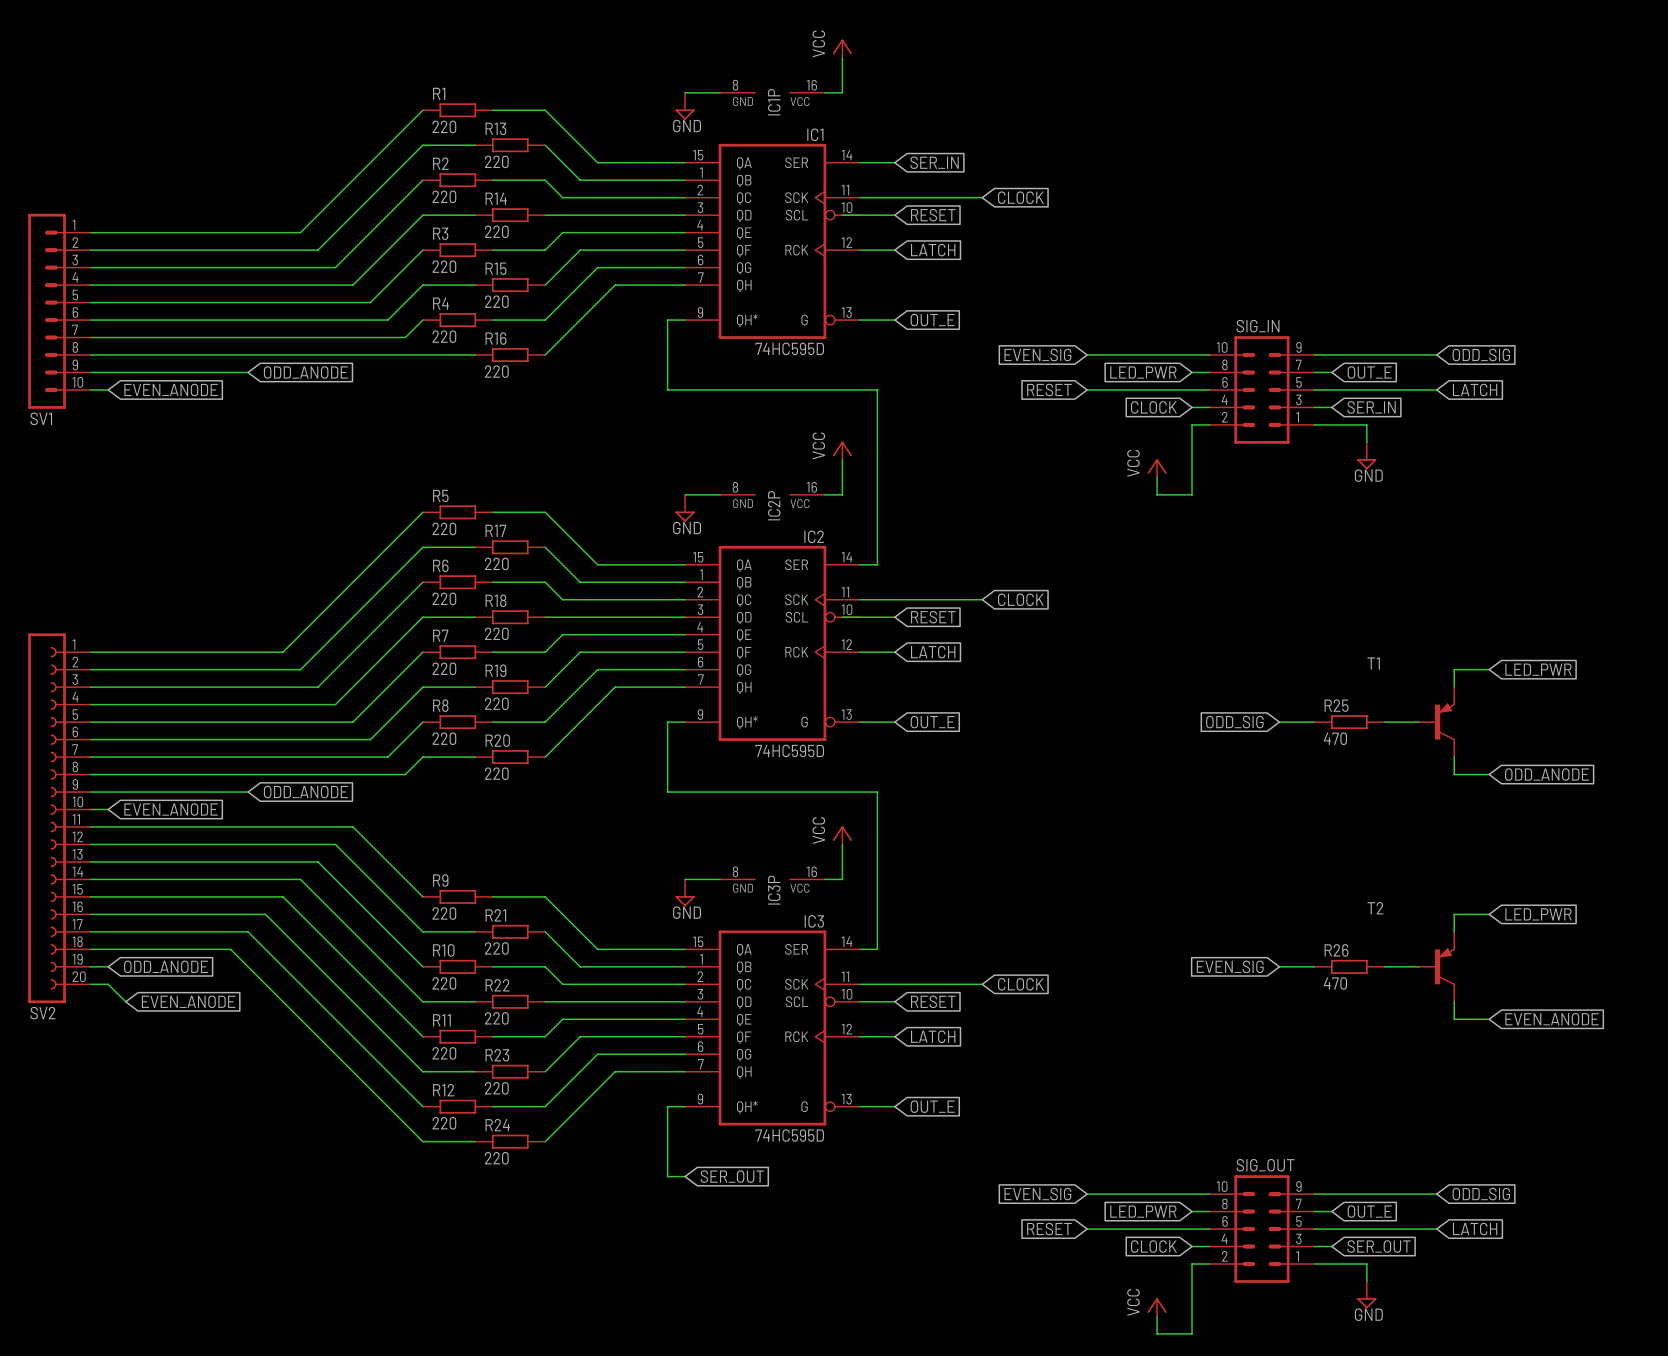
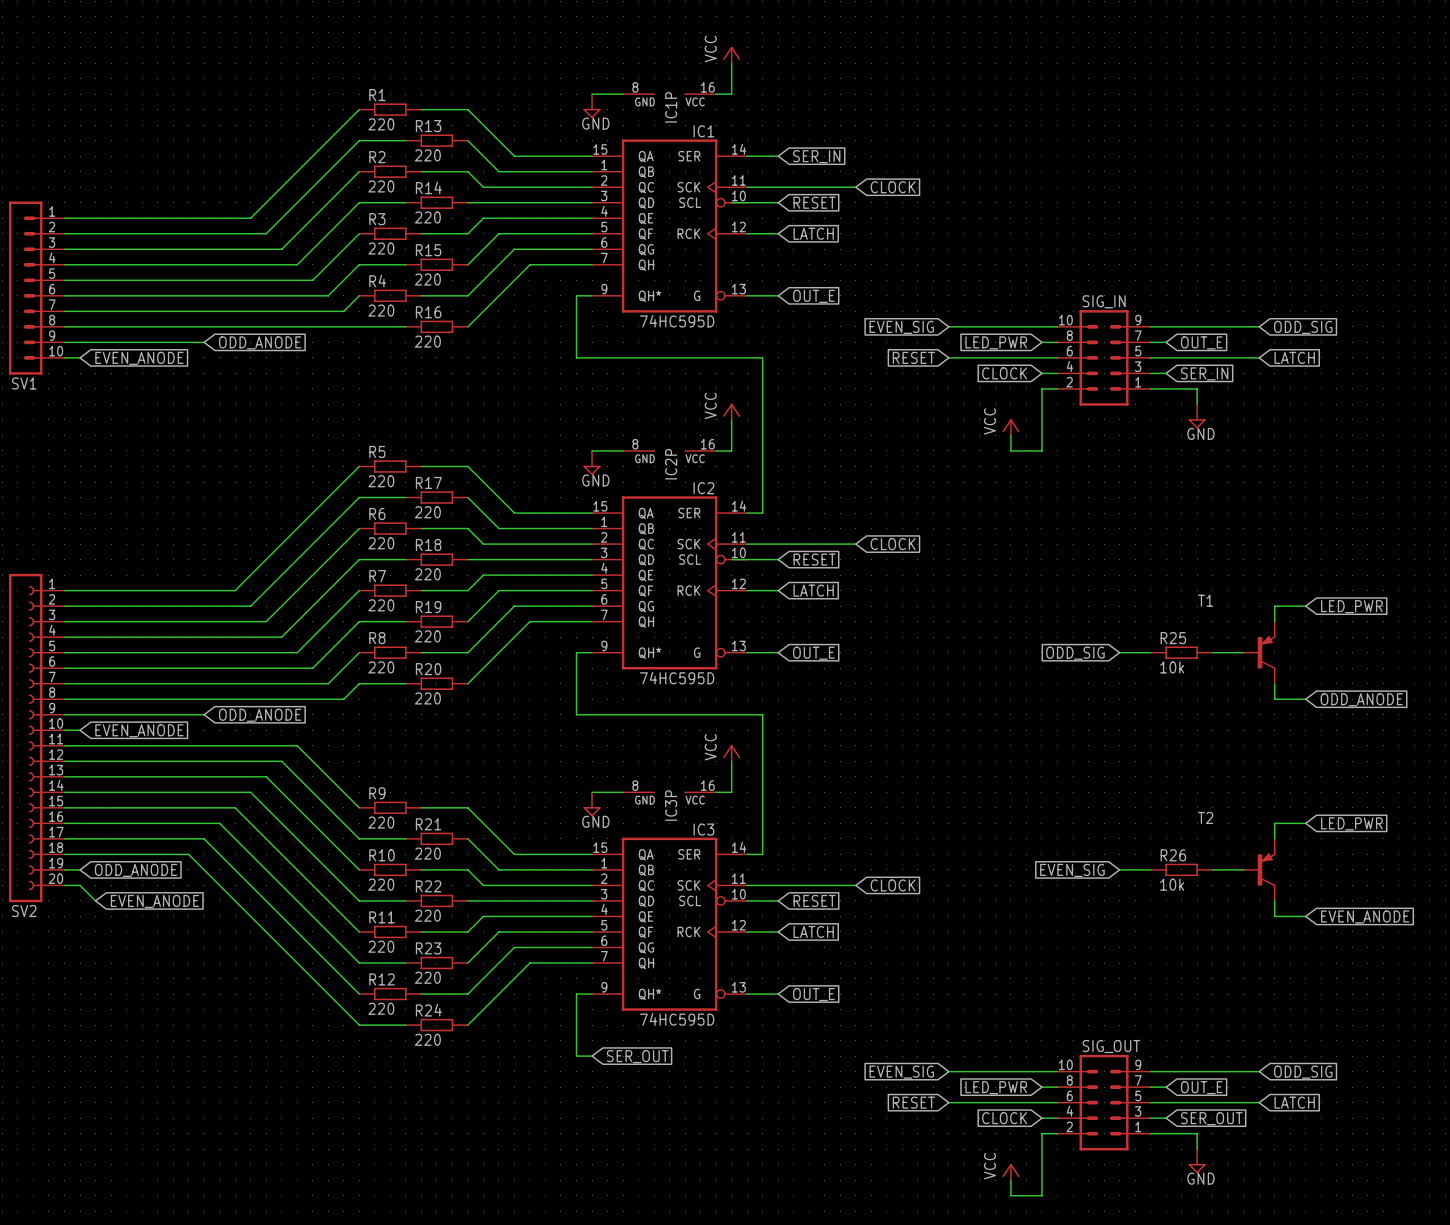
R25 value: 470 (1335, 738) -> 10k (1172, 667)
R26 value: 470 (1335, 983) -> 10k (1172, 884)

